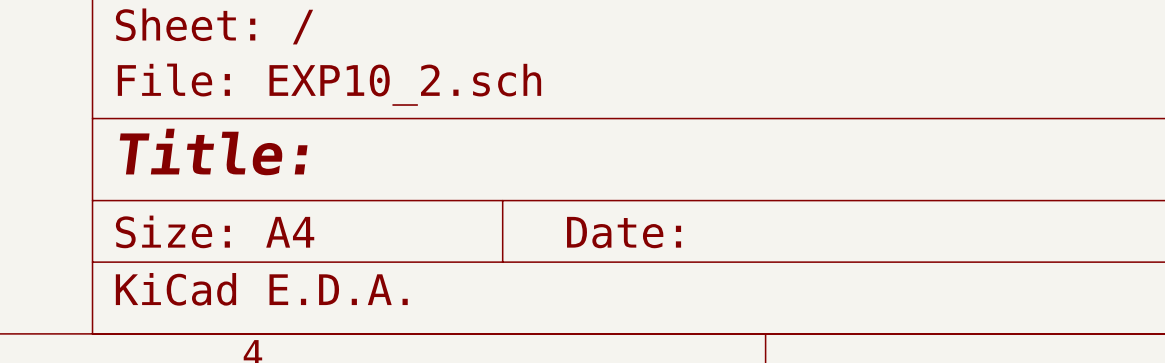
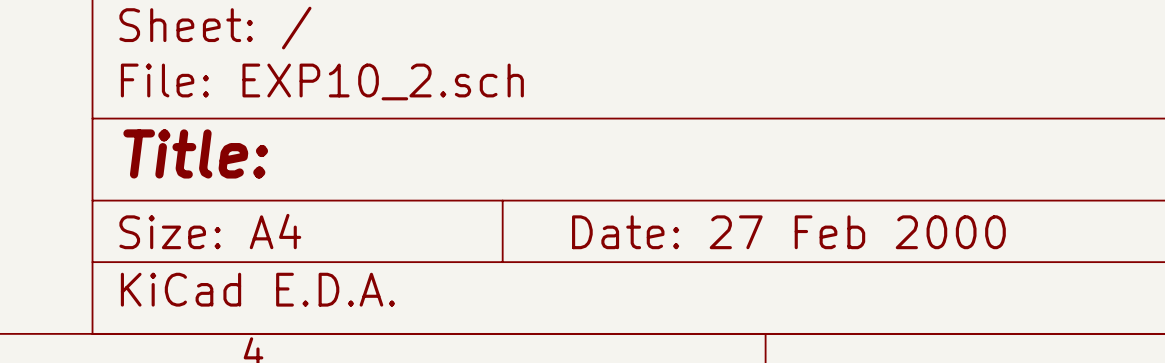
title block: Date: (624, 232) -> Date: 27 Feb 2000 (788, 232)

